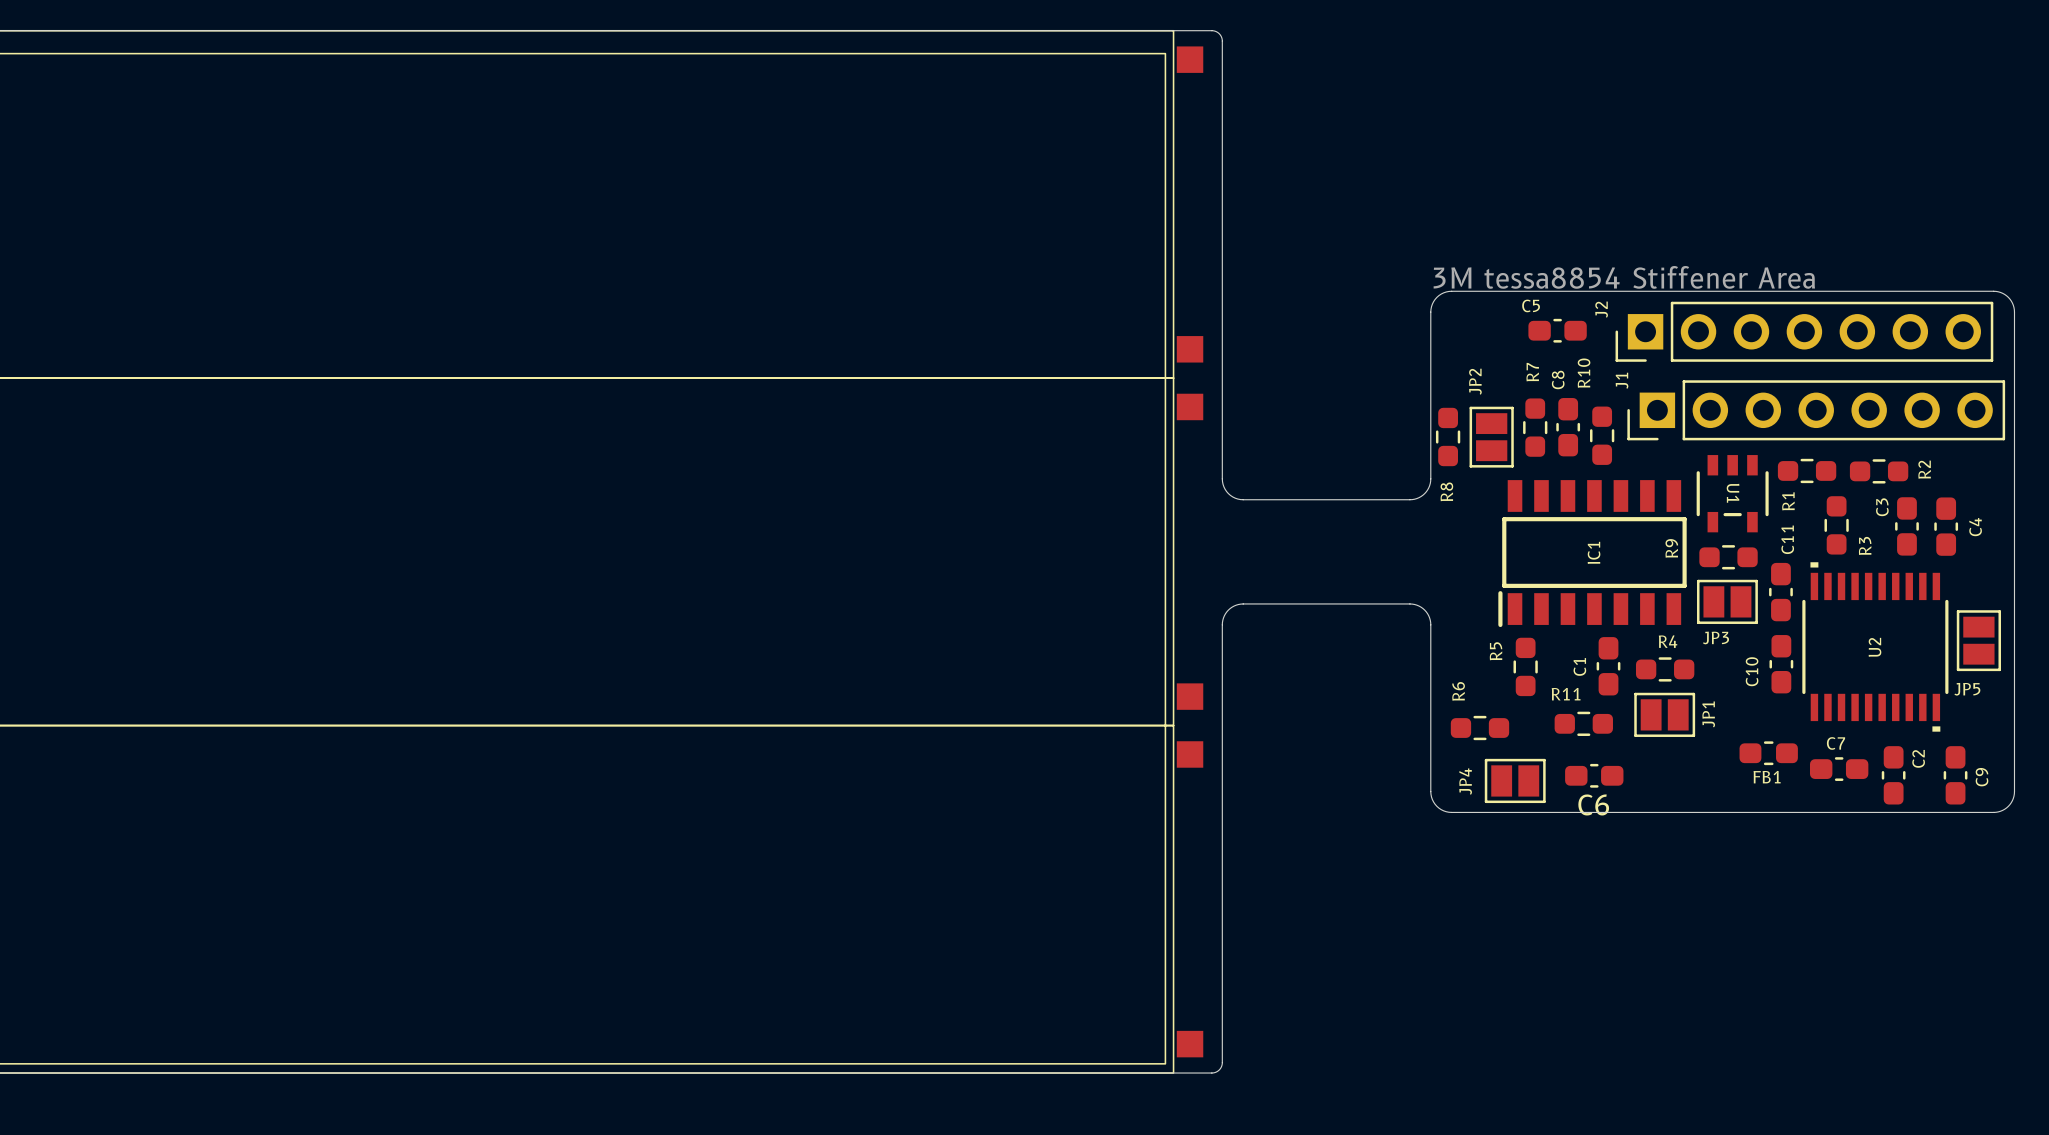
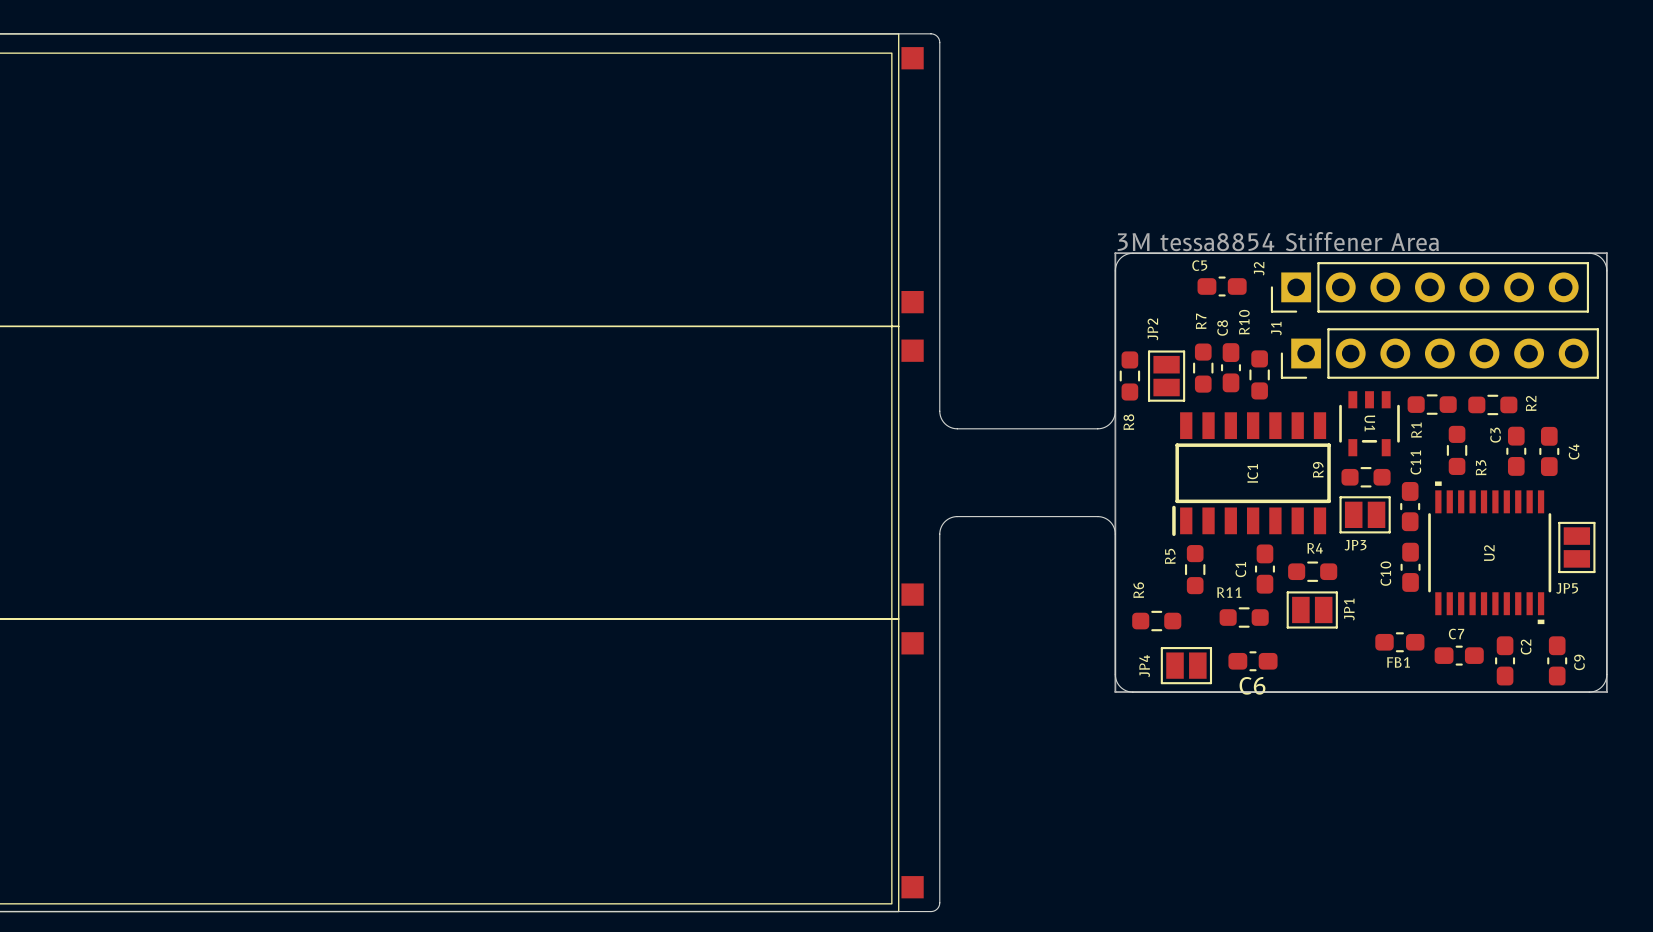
line: none -> (1115, 253) (1606, 253) (1606, 692) (1115, 692) (1115, 253)

